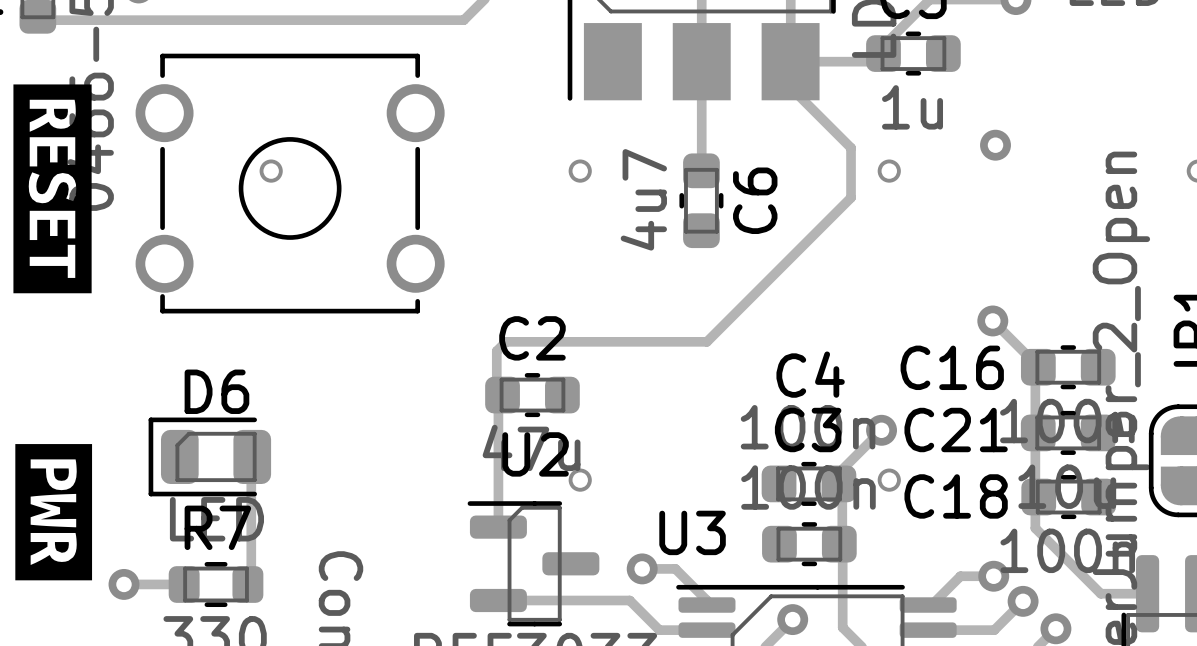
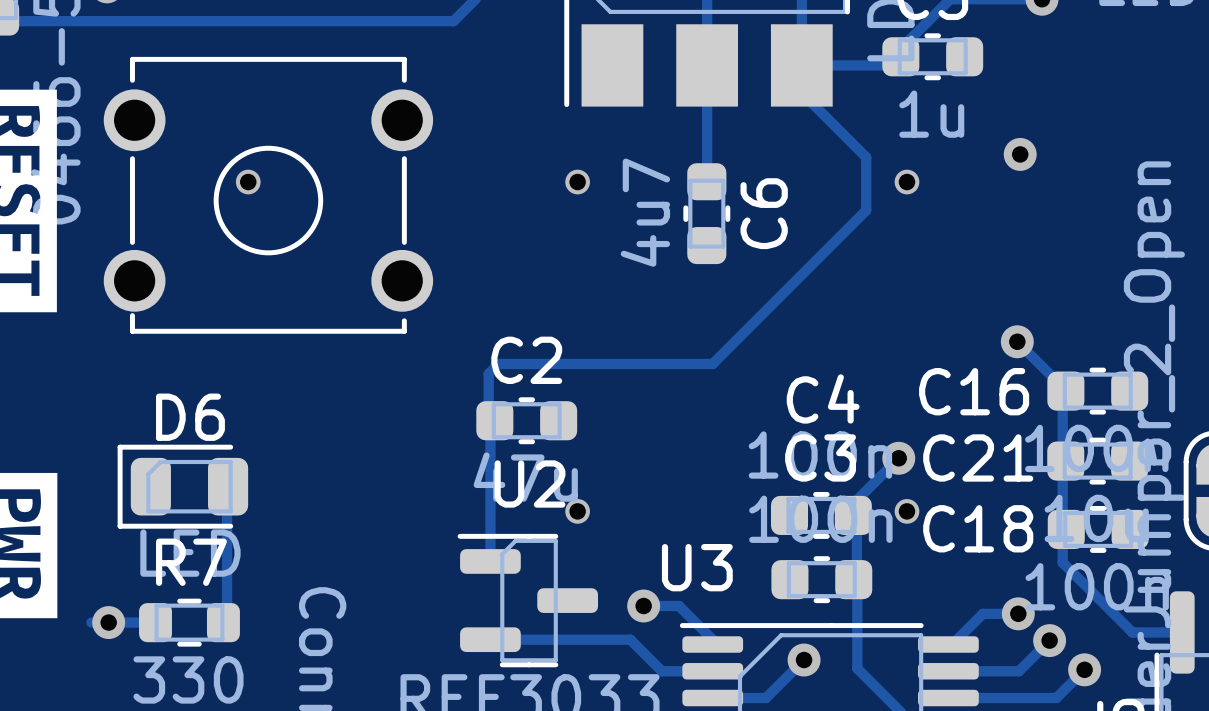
via position: (123, 584) -> (108, 622)

